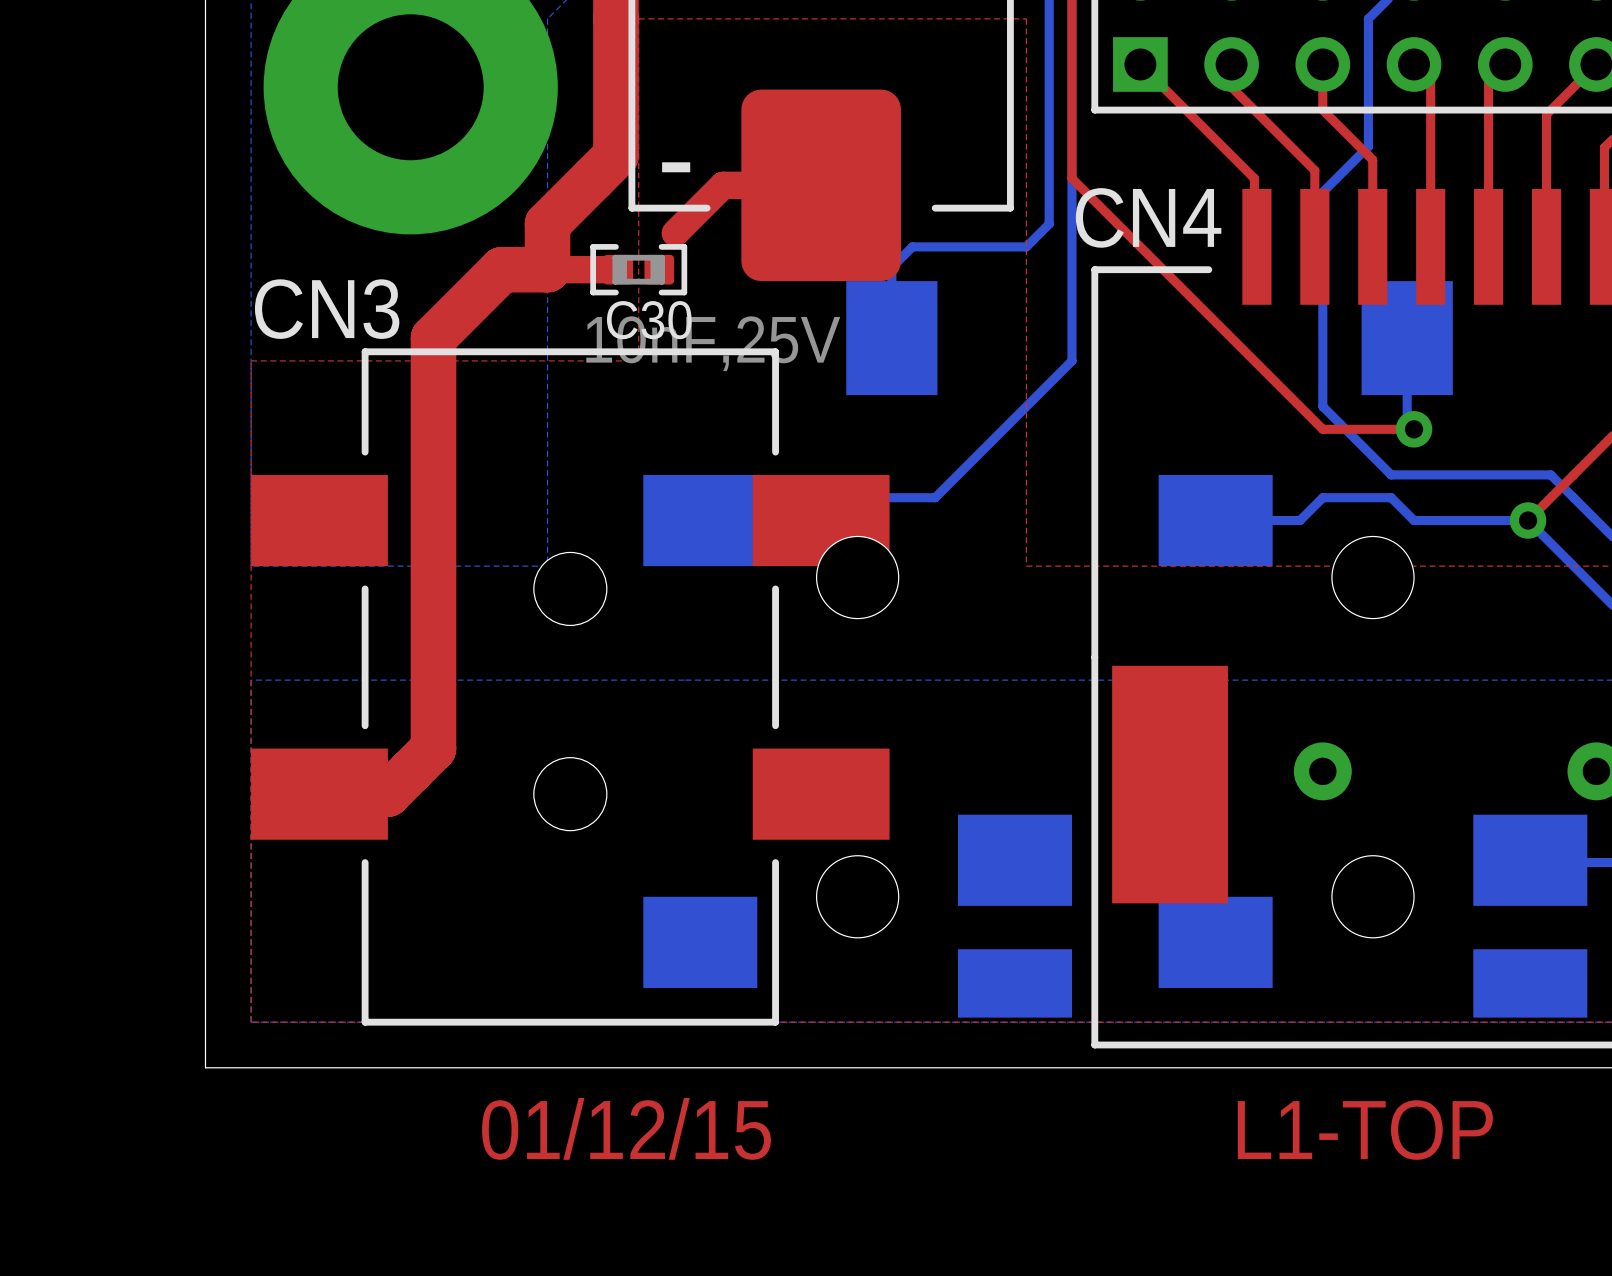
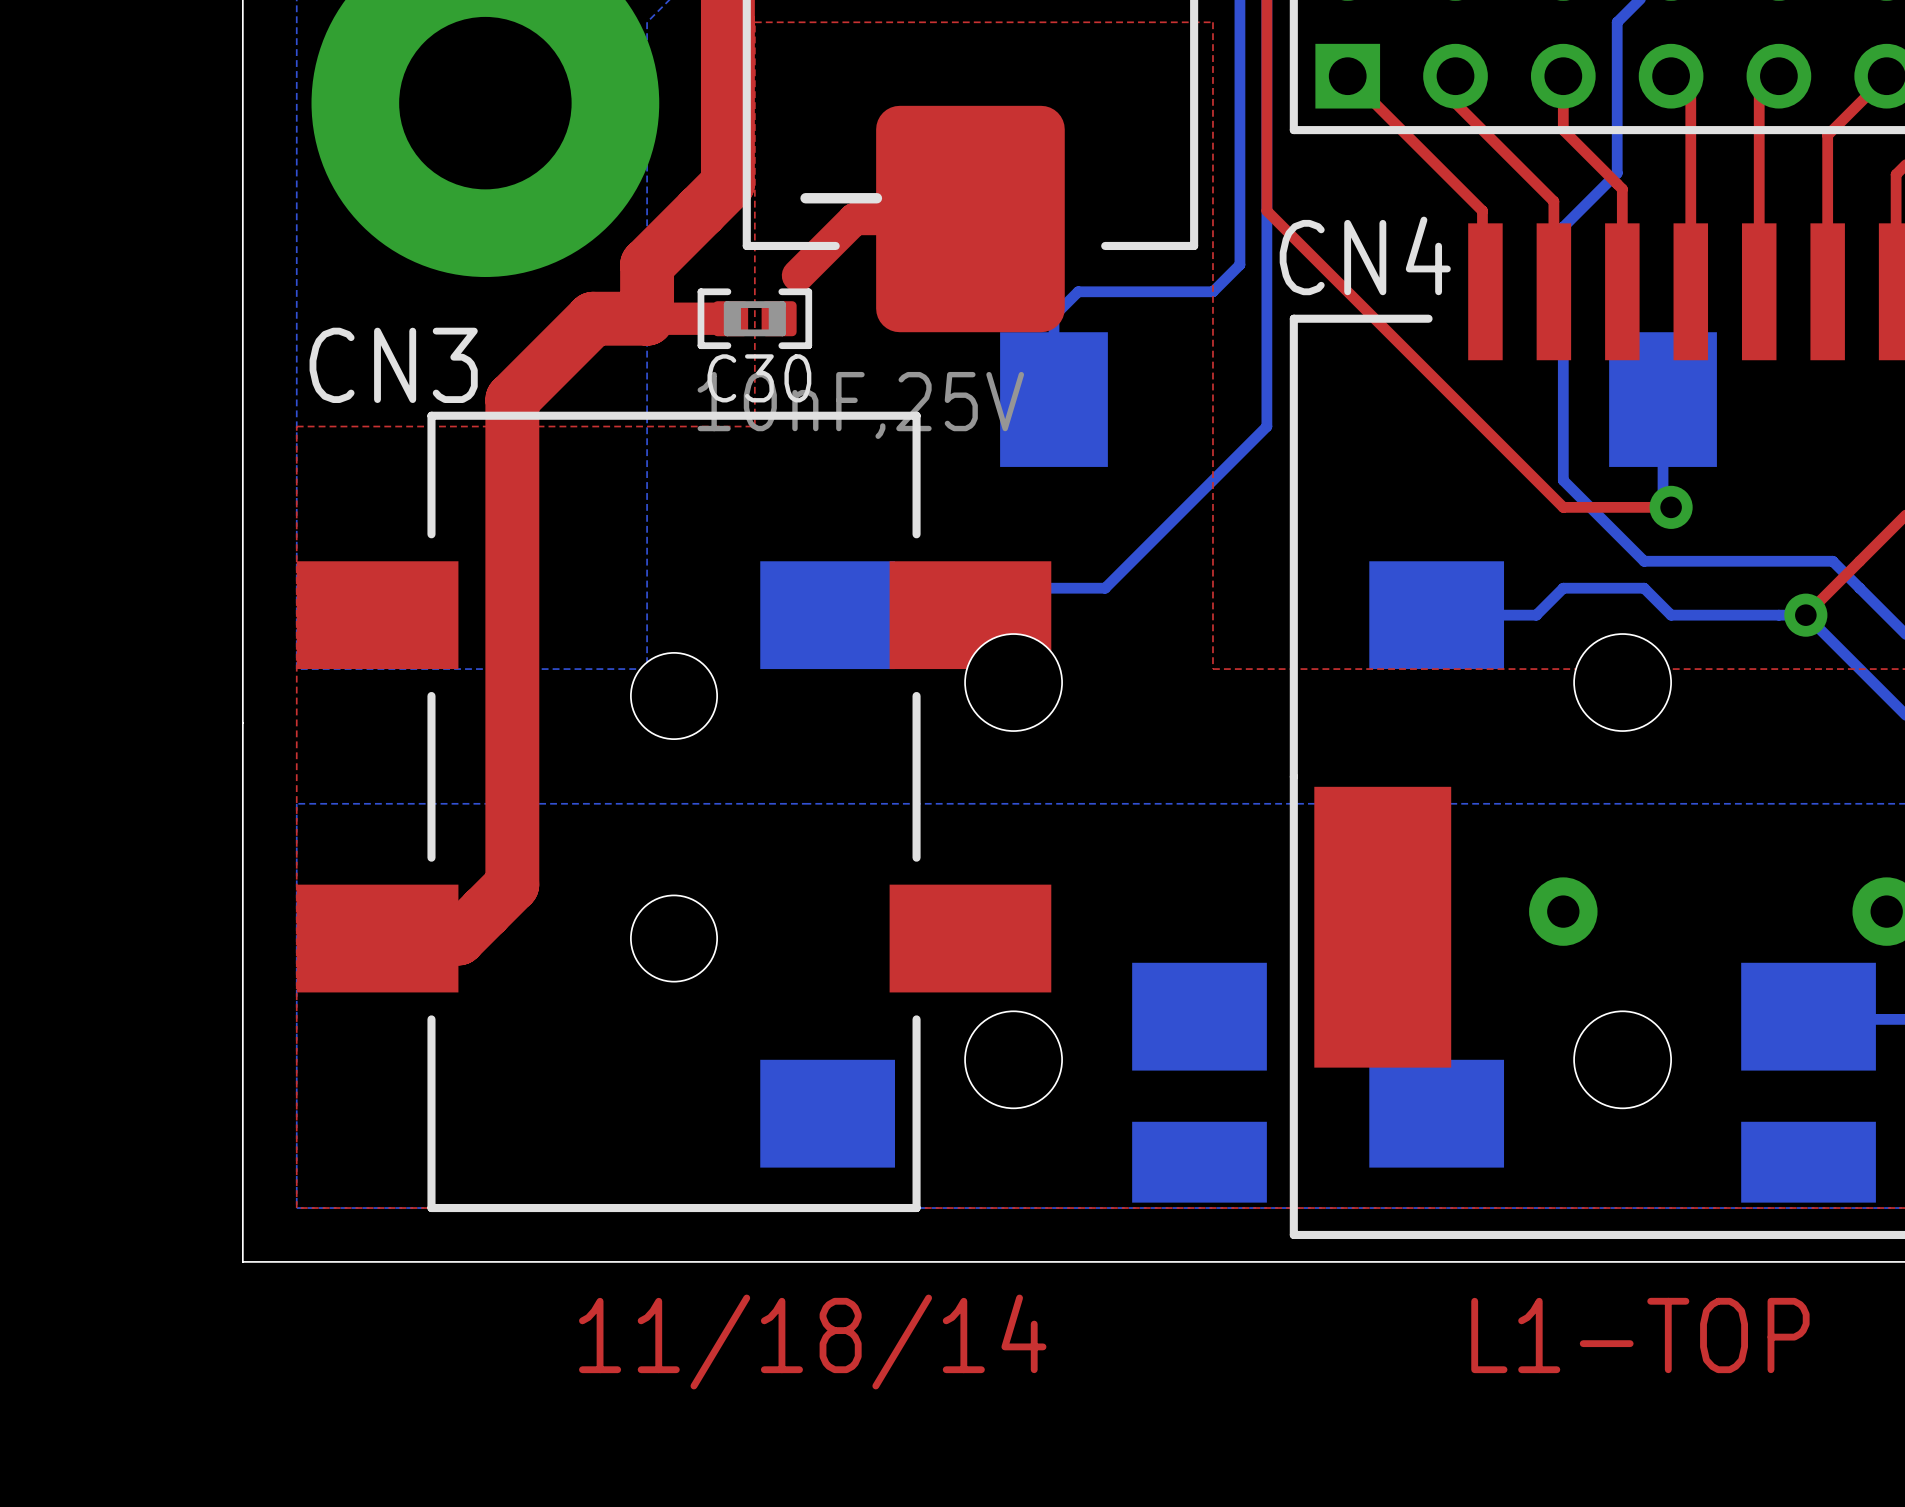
text: 01/12/15 (626, 1128) -> 11/18/14 (812, 1342)

